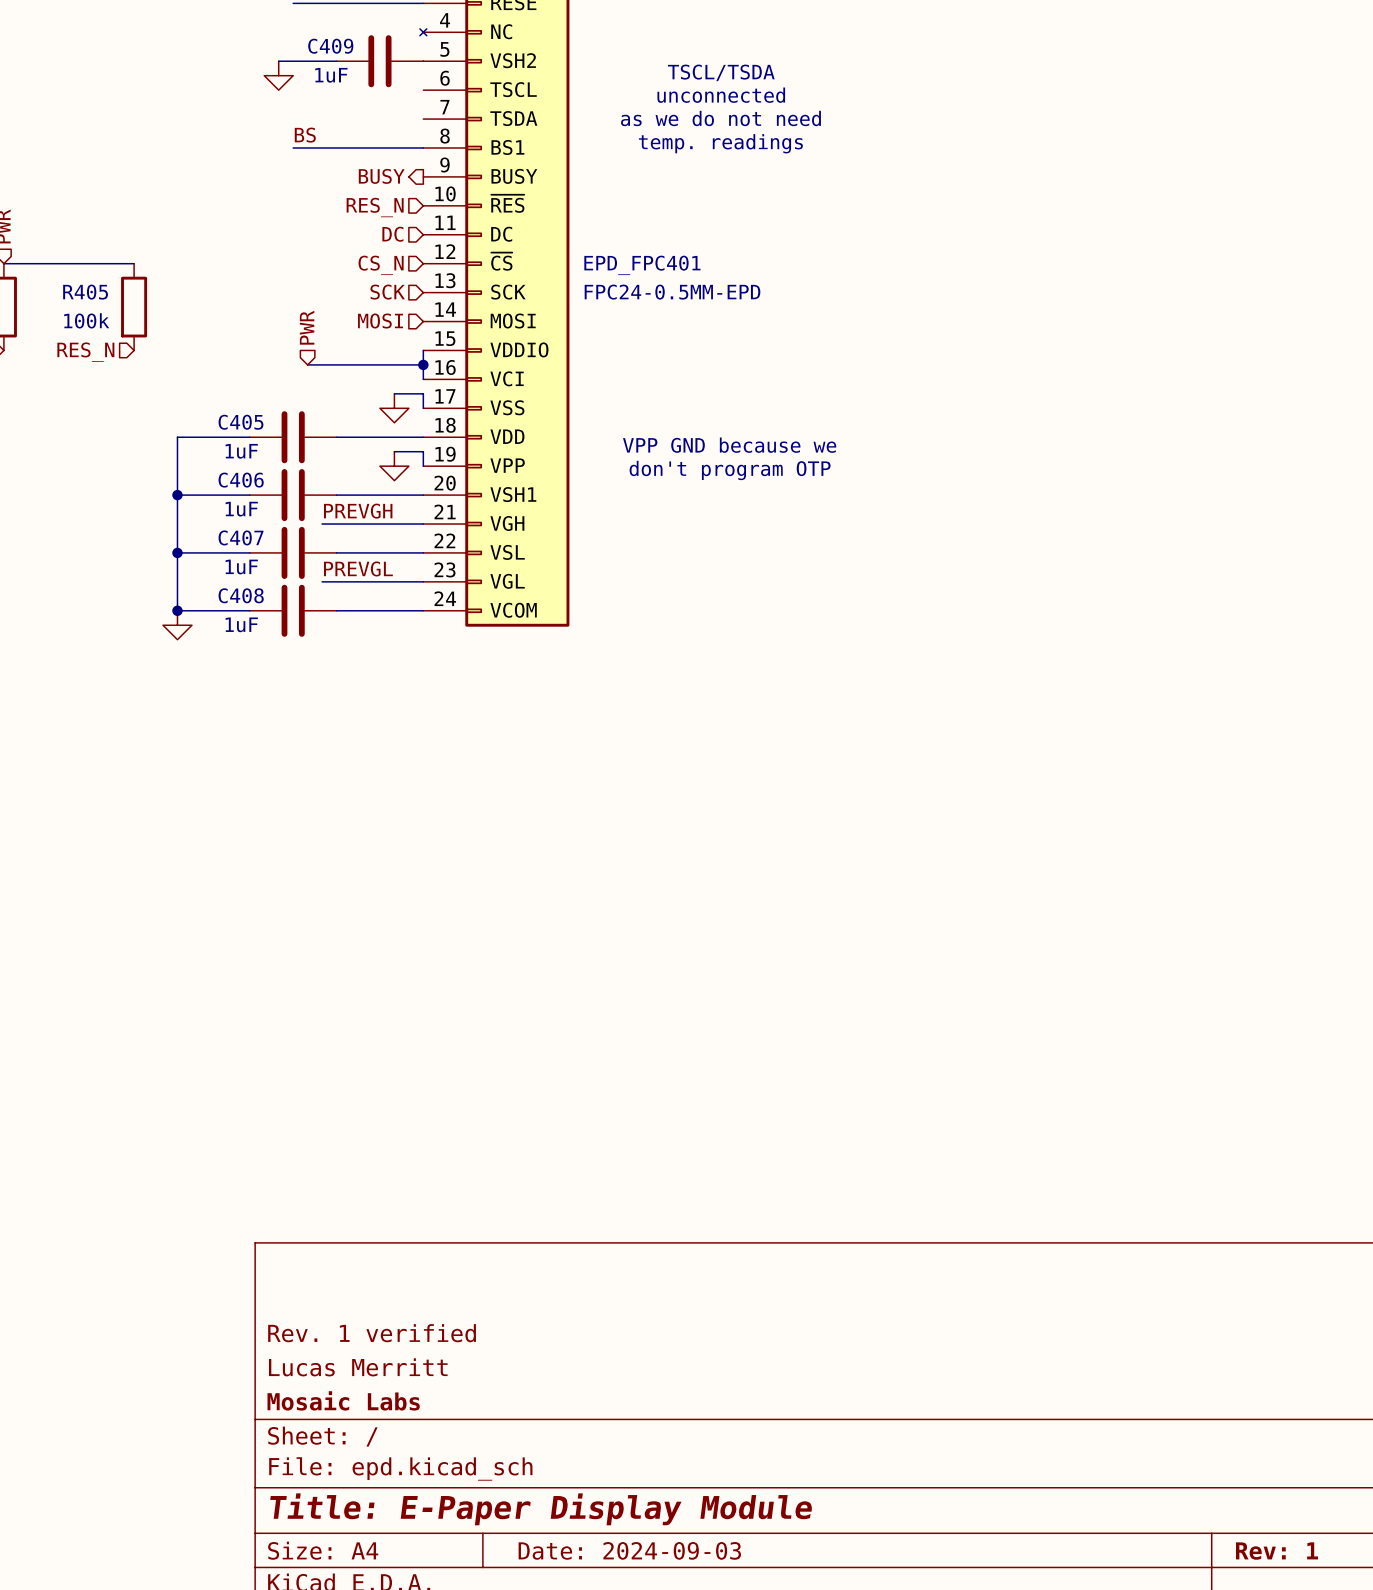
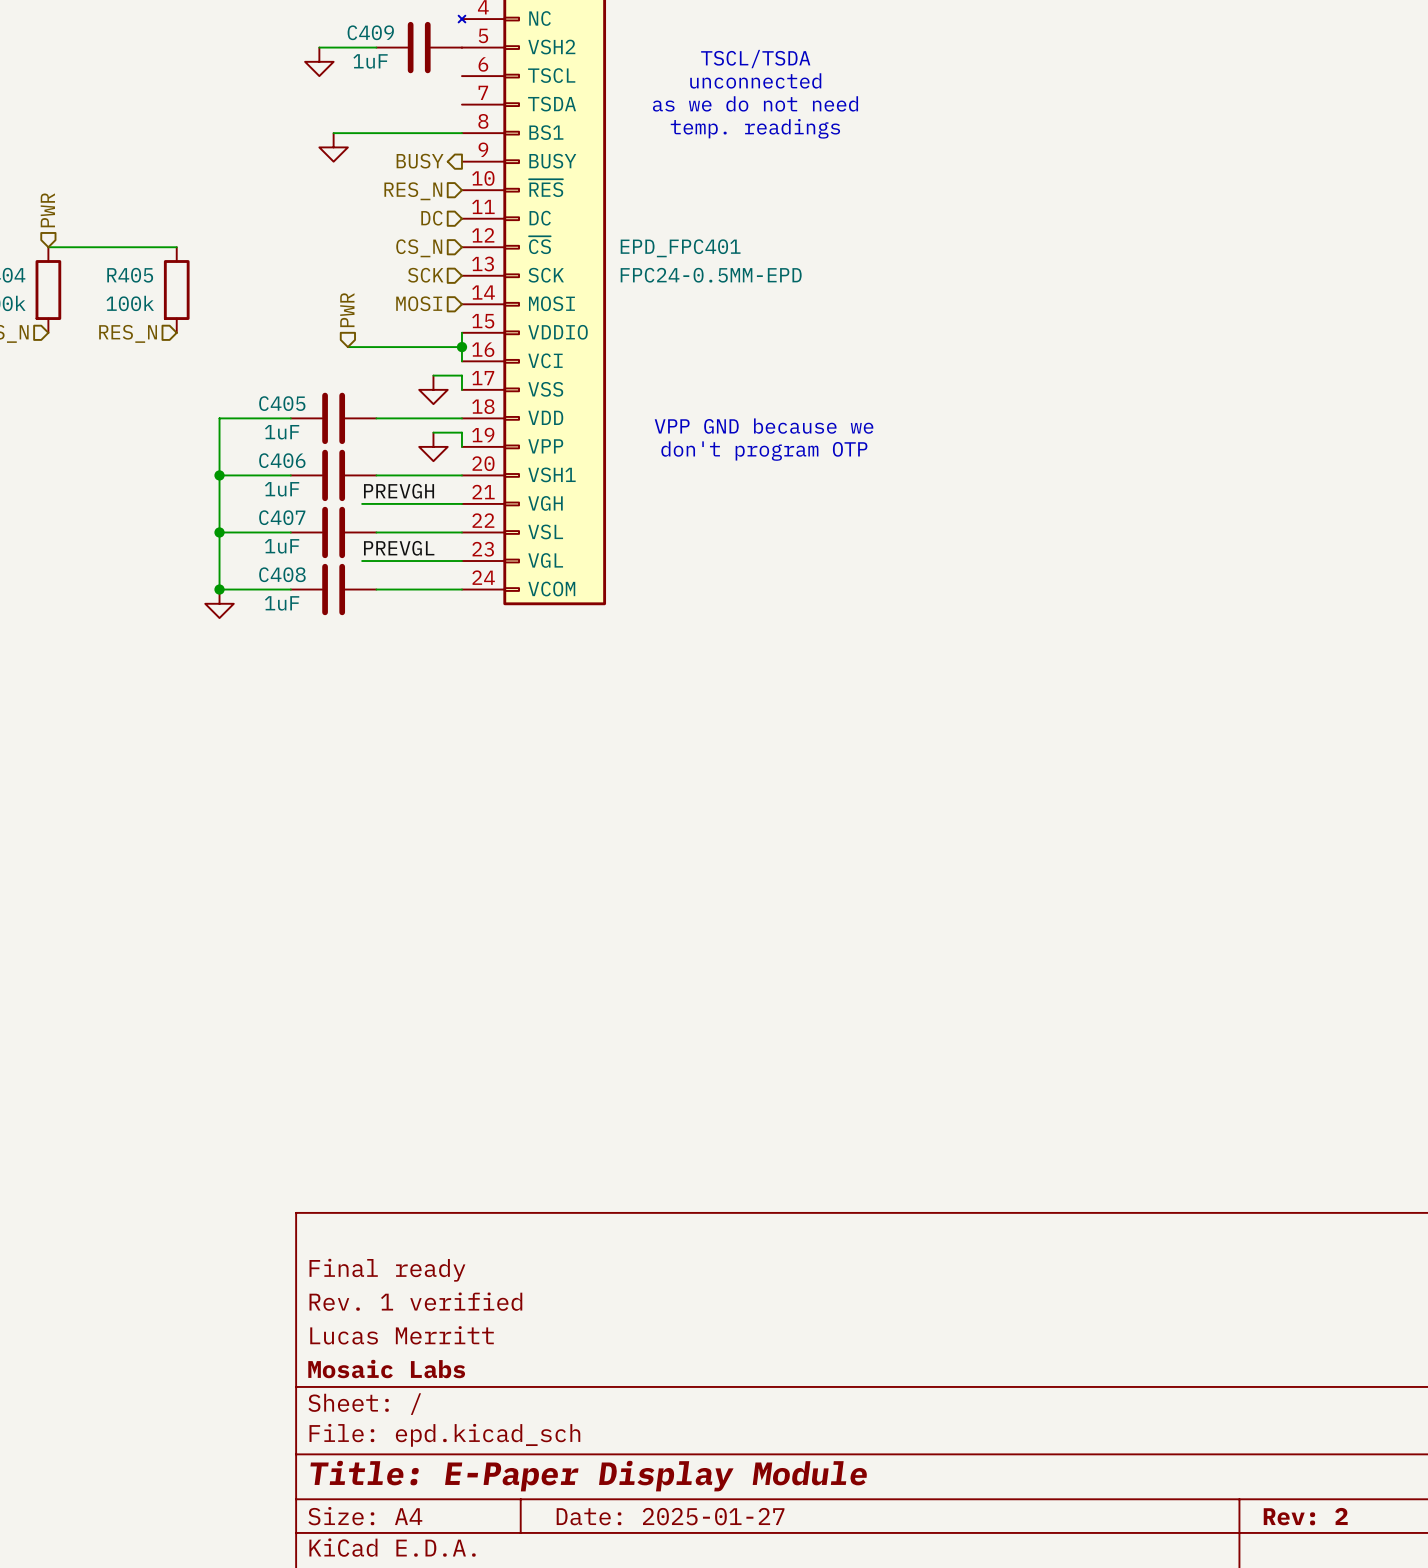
label: BS (305, 135) -> none
power symbol: none -> (333, 147)
title block: none -> Final ready (387, 1270)
title block: Date: 2024-09-03 (629, 1550) -> Date: 2025-01-27 (670, 1516)
title block: Rev: 1 (1276, 1551) -> Rev: 2 (1305, 1516)

